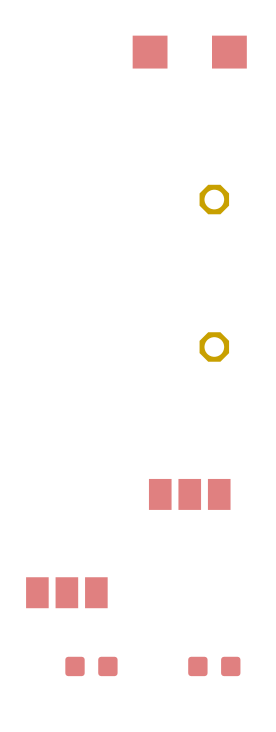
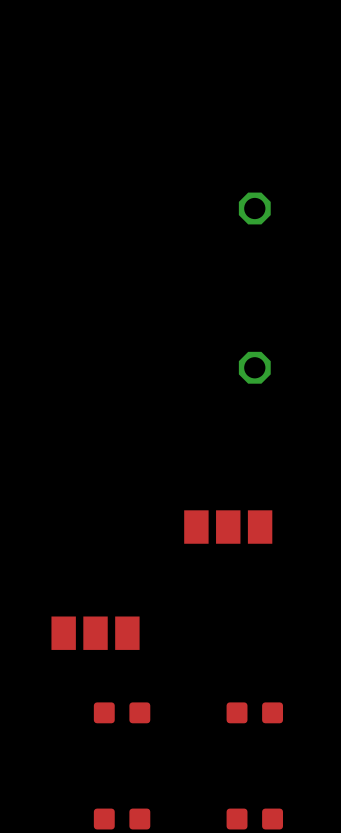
part: (189, 52) -> none

